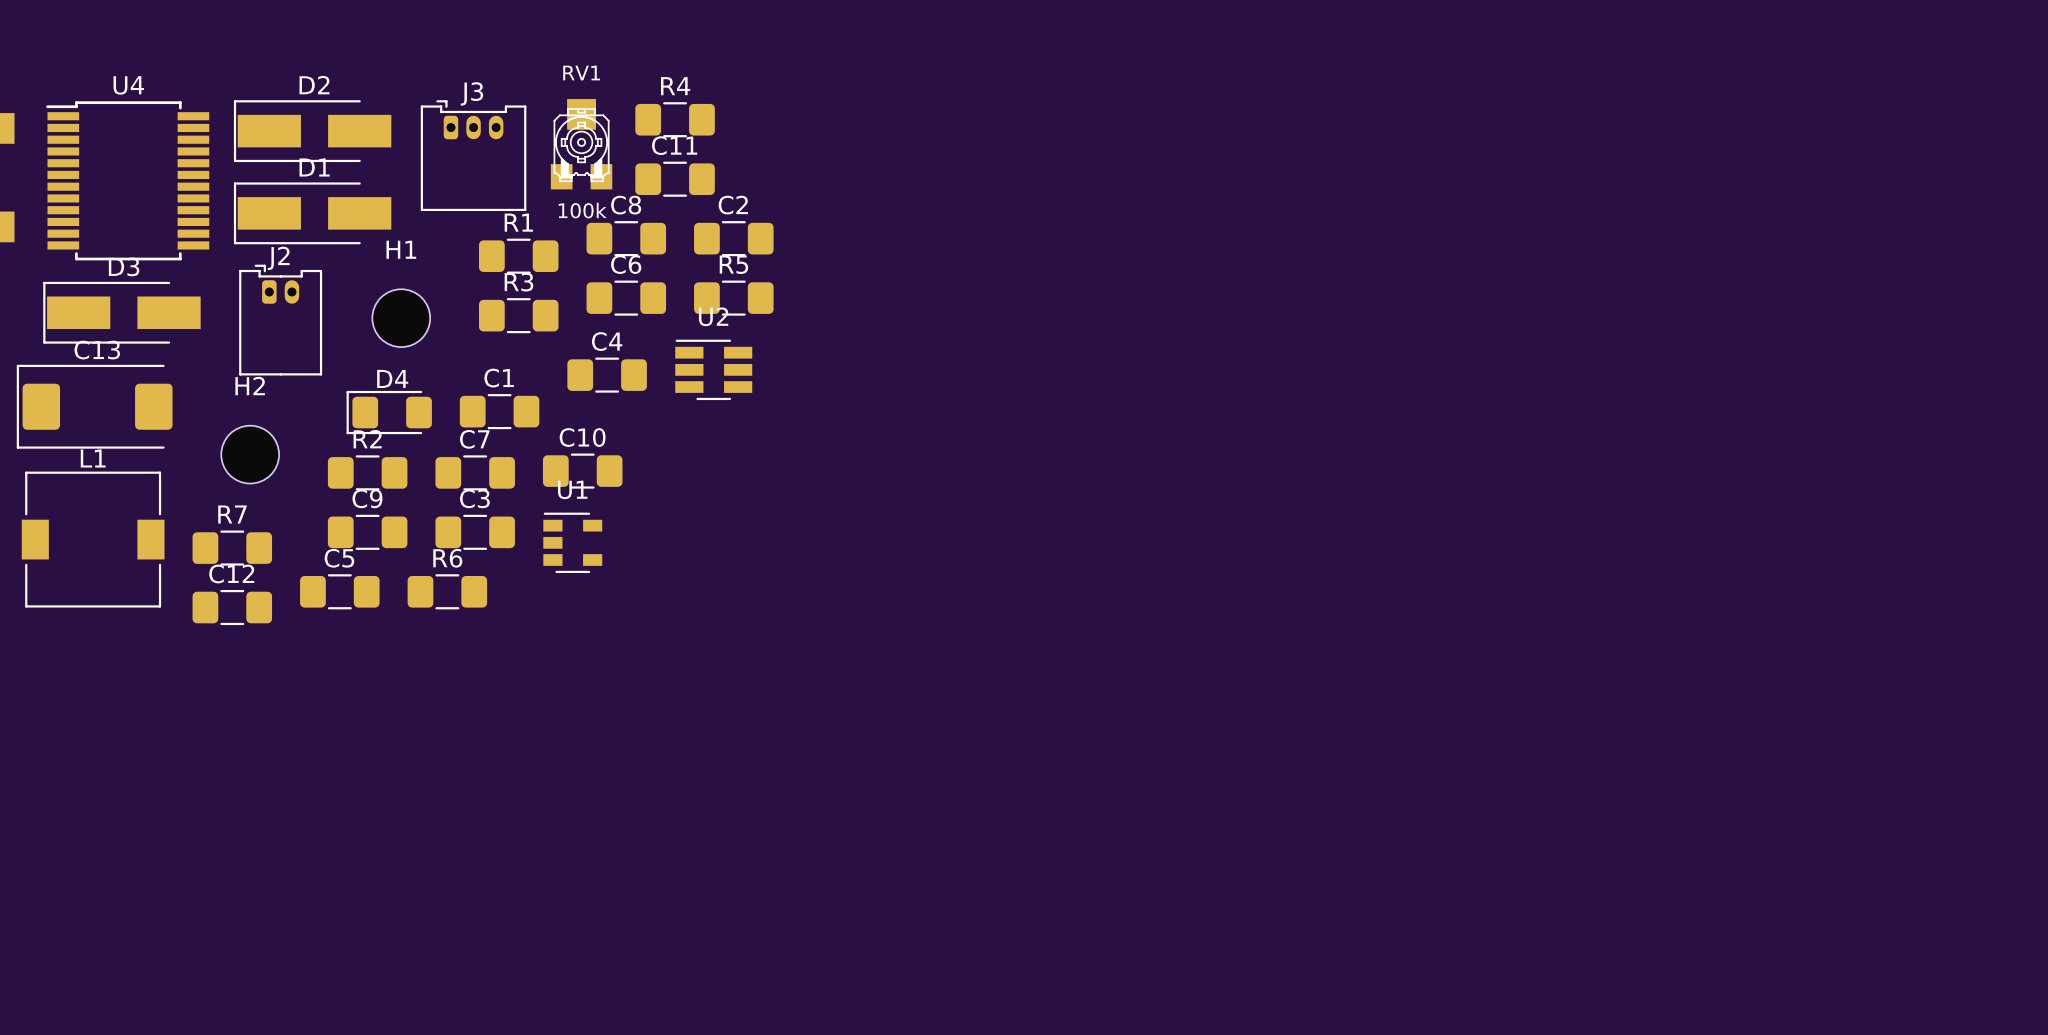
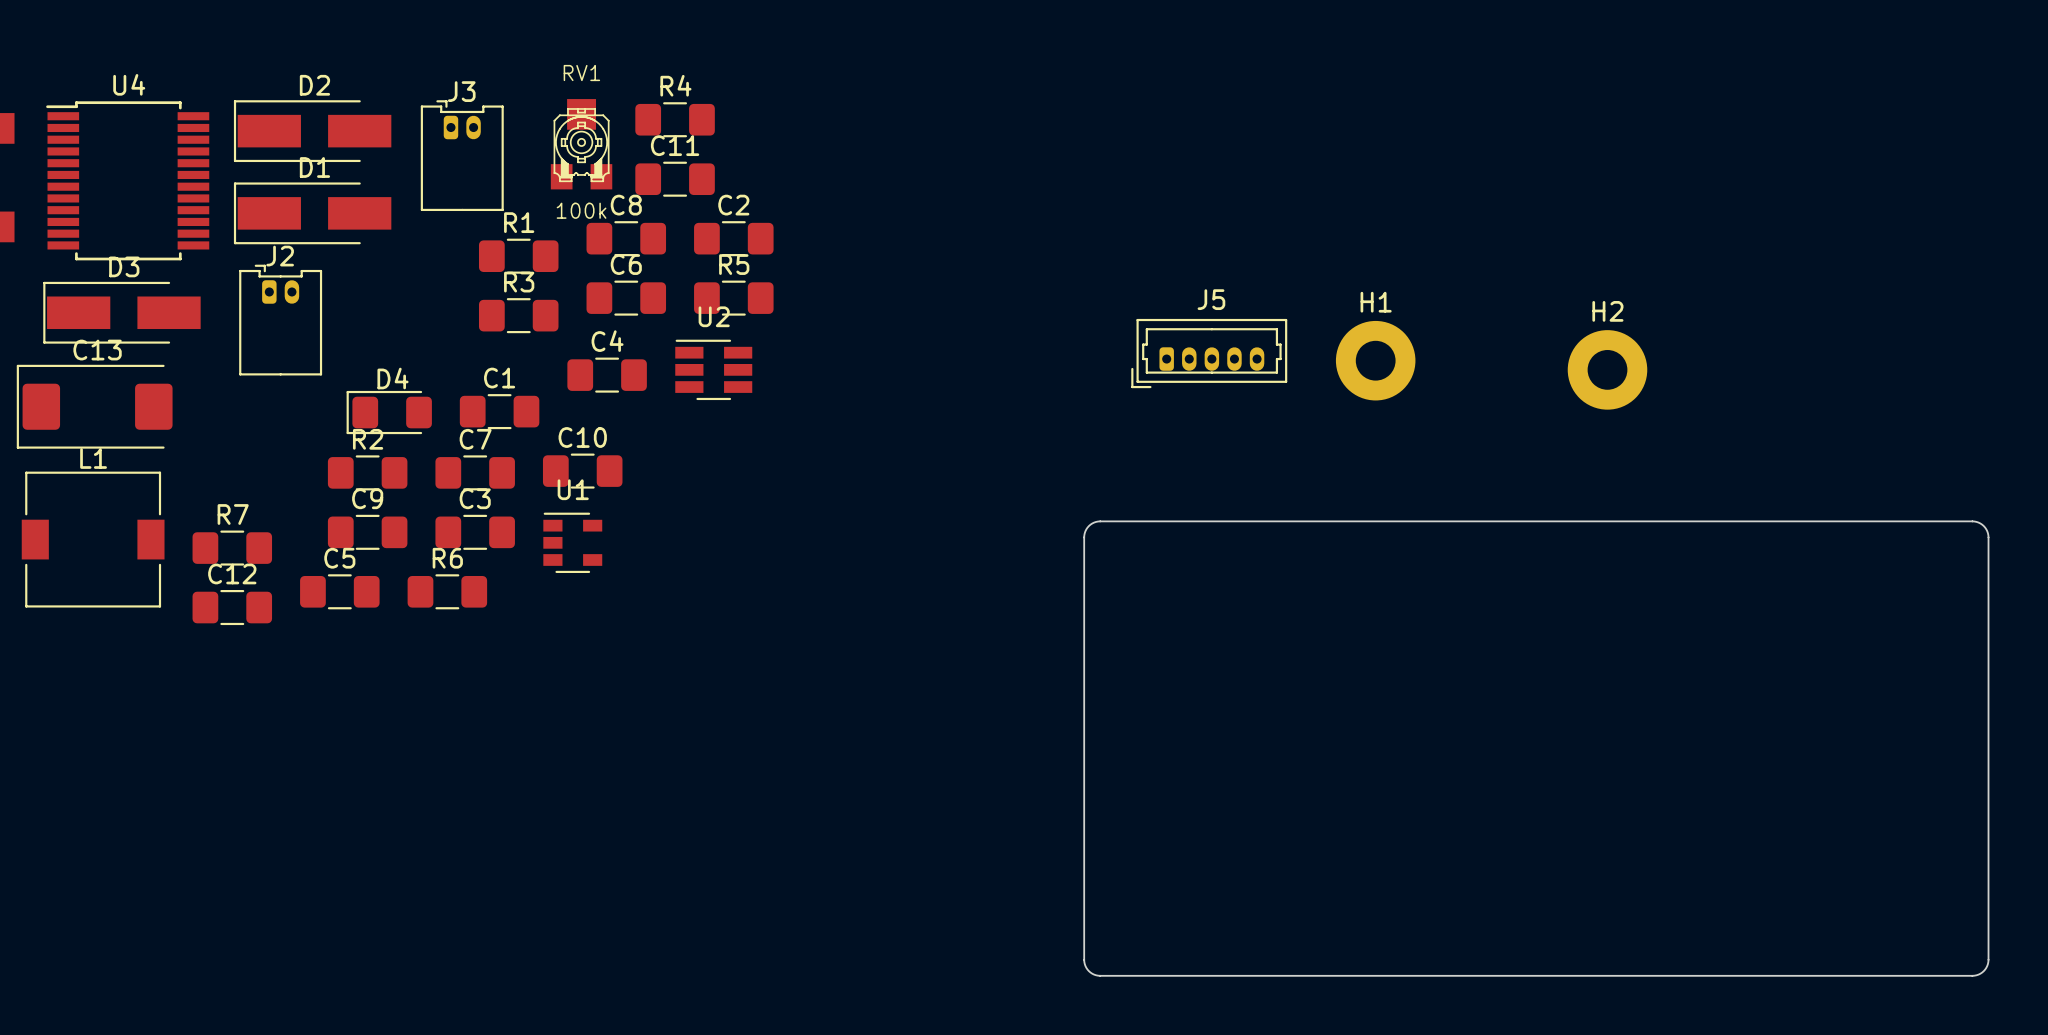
J3 footprint: [420, 100, 527, 212] -> [420, 100, 504, 212]
H1 footprint: [372, 289, 431, 348] -> [1335, 320, 1416, 401]
J5: none -> (1209, 353)
H2 footprint: [221, 425, 280, 484] -> [1567, 330, 1648, 410]
board edge: none -> (1100, 521) (1972, 521) (1980, 523) (1986, 529) (1988, 537) (1988, 959) (1986, 967) (1980, 973) (1972, 975) (1100, 975) (1092, 973) (1086, 967) (1084, 959) (1084, 537) (1088, 526) (1100, 521)

